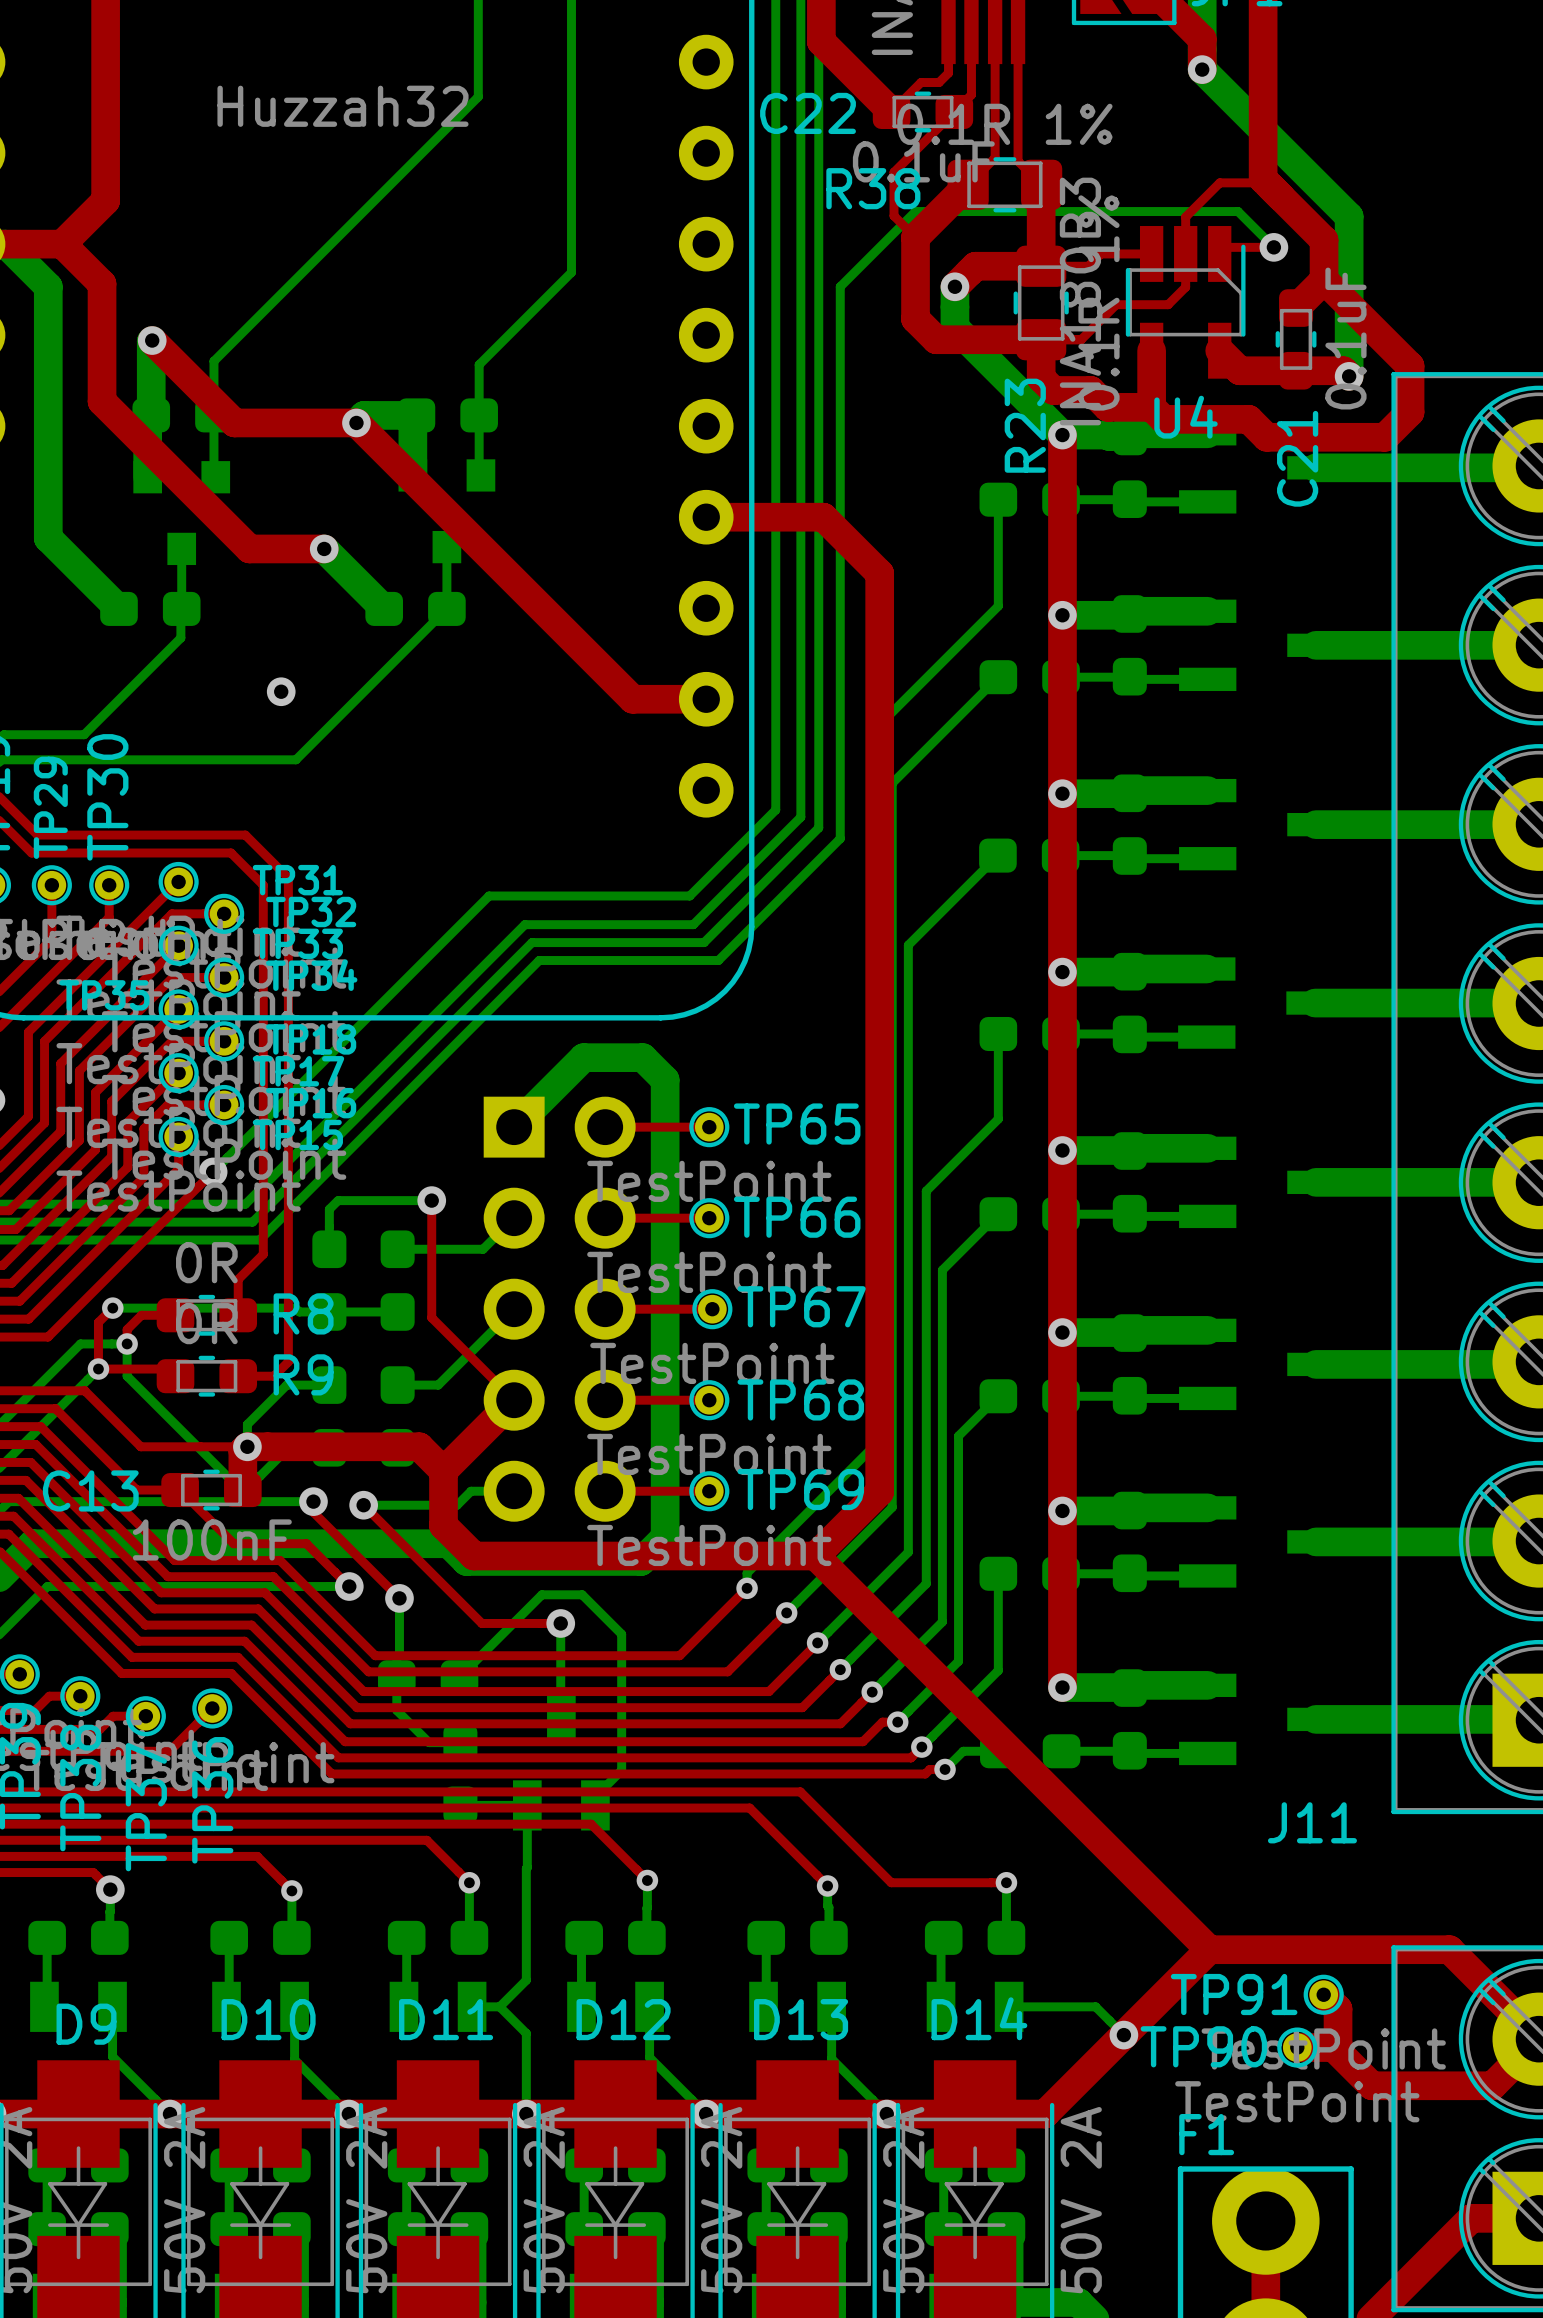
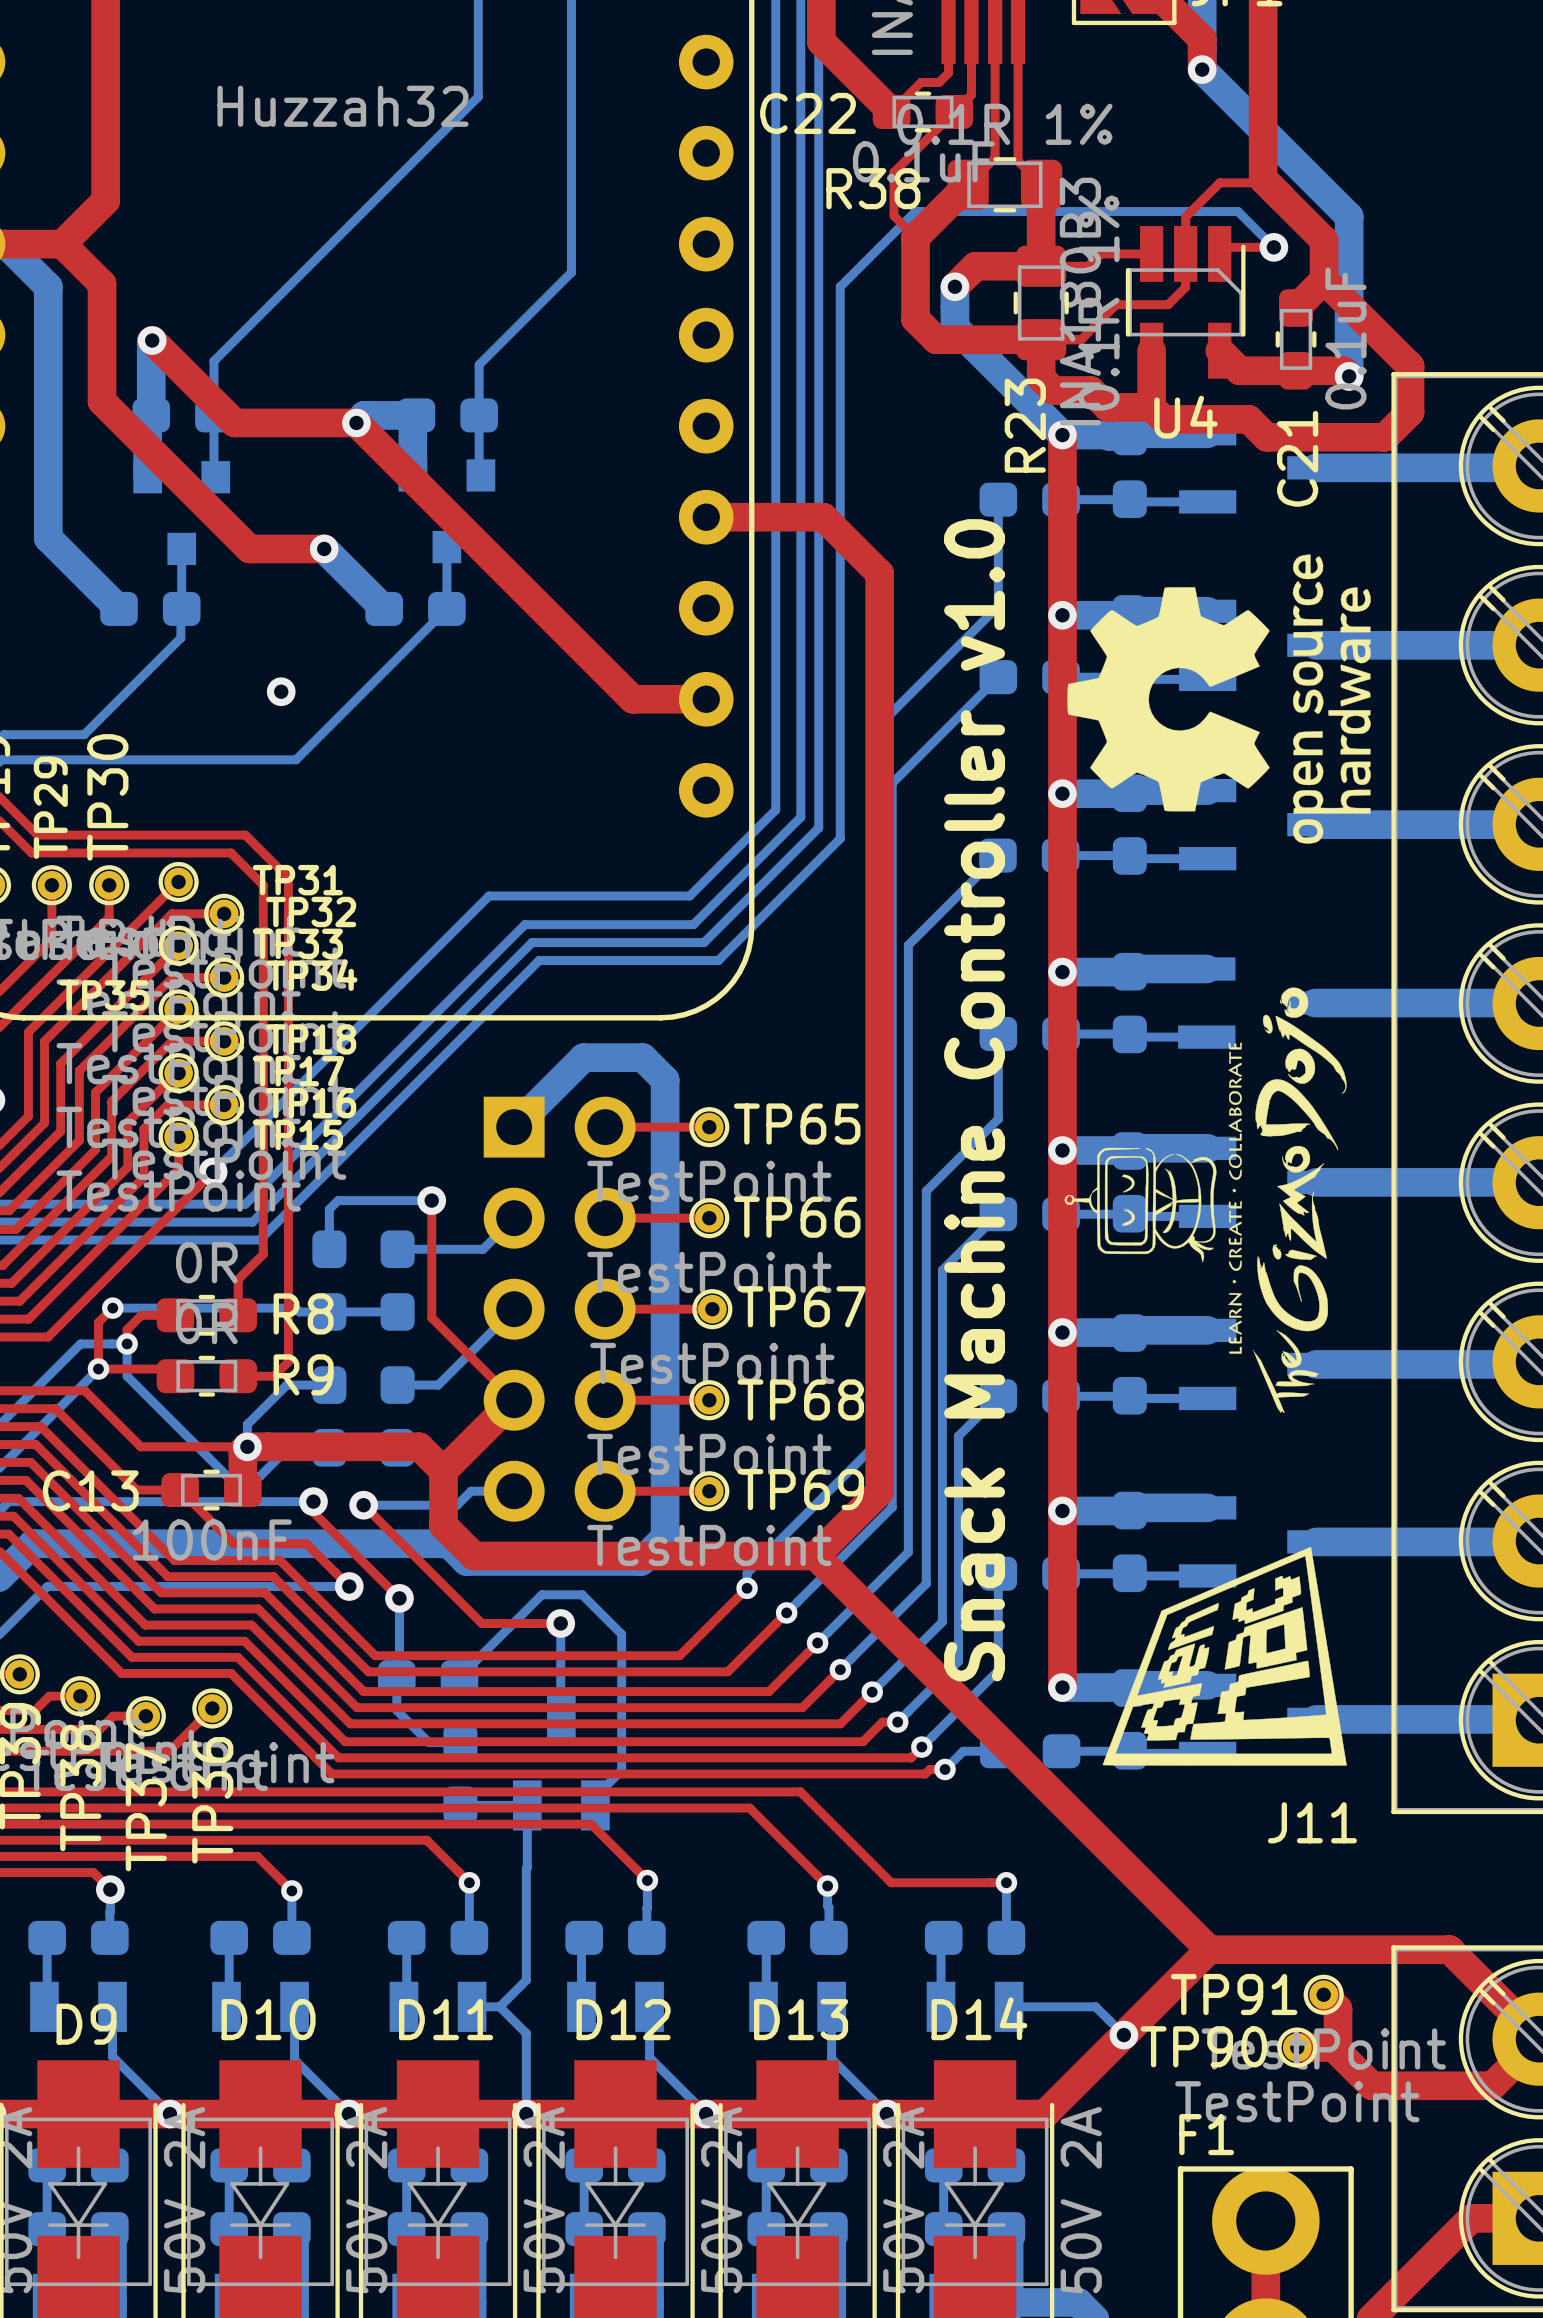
drawing: none -> [1067, 554, 1371, 844]
drawing: none -> [1064, 987, 1347, 1414]
text: none -> Snack Machine Controller v1.0 (974, 1100)
drawing: none -> [1102, 1546, 1347, 1766]

